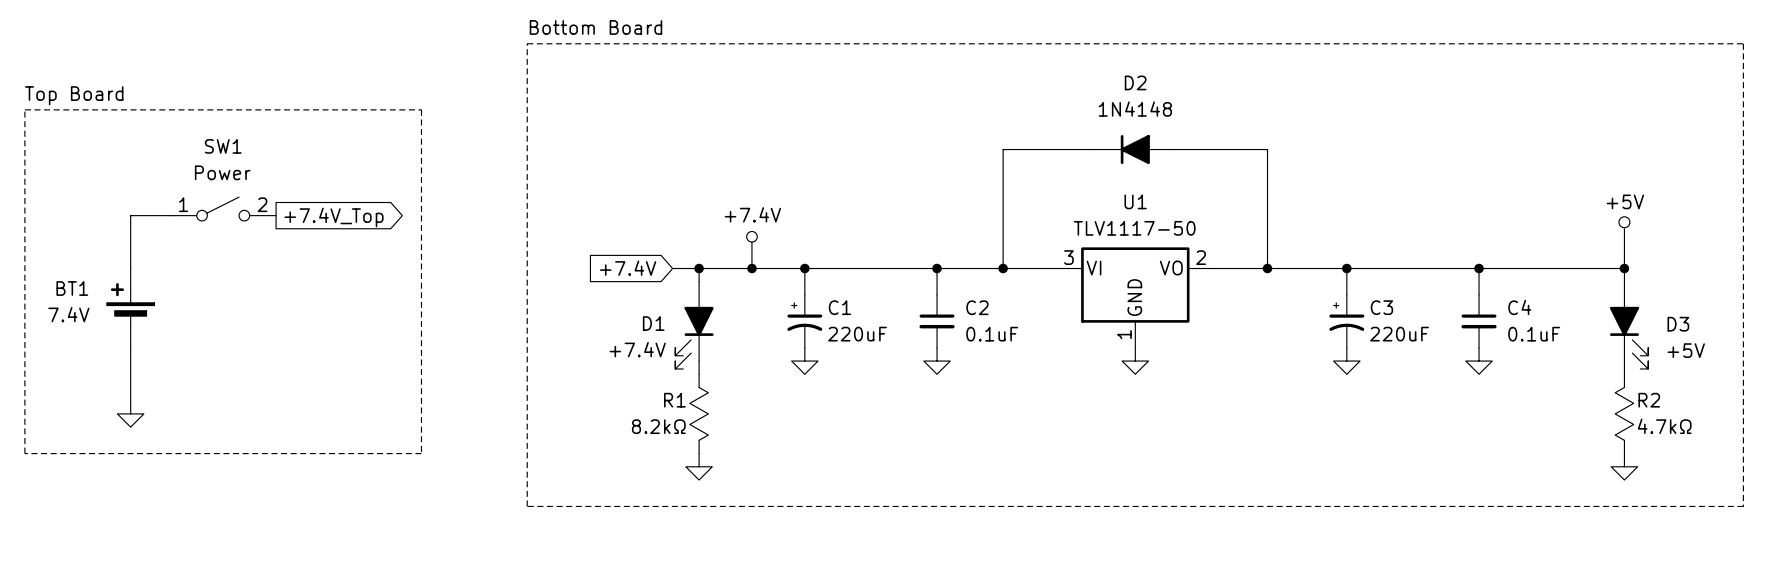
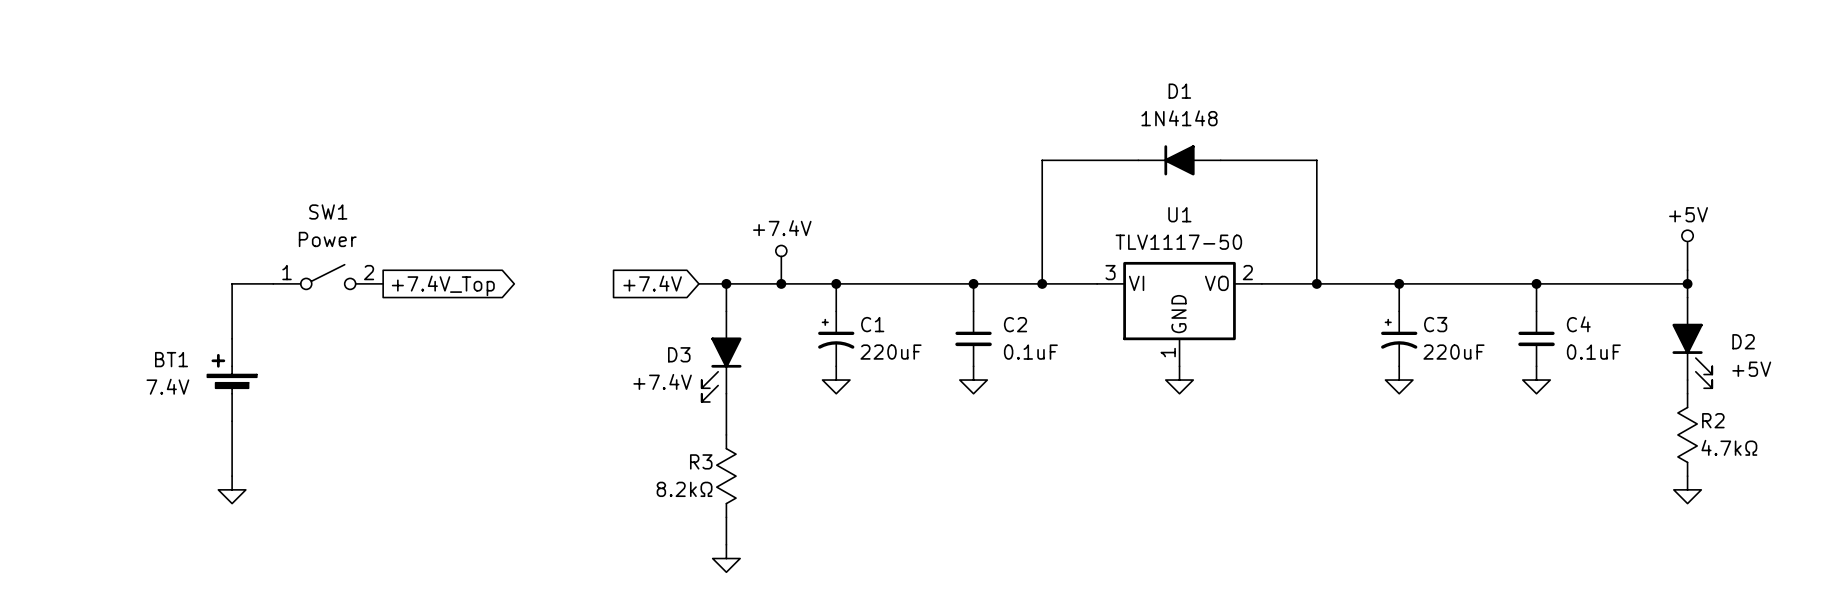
text: Bottom Board (595, 27) -> none
line: (527, 43) (1743, 43) (1743, 506) (527, 506) (527, 43) -> none
D2 name: D2 (1135, 82) -> D1 (1179, 91)
text: Top Board (74, 95) -> none
line: (24, 109) (421, 109) (421, 453) (24, 453) (24, 109) -> none
SW1 position: (223, 209) -> (328, 277)
wire: (170, 215) (130, 215) (130, 268) -> (273, 283) (232, 283) (232, 338)
global label position: +7.4V_Top (334, 217) -> +7.4V_Top (443, 285)
BT1 position: (130, 308) -> (232, 380)
D3 name: D3 (1678, 324) -> D2 (1743, 341)
D1: +7.4V (694, 325) -> none
D3: none -> +7.4V (721, 356)
wire: (130, 347) (130, 400) -> (232, 421) (232, 476)
power symbol position: (130, 413) -> (232, 489)
R1: 8.2kΩ (699, 413) -> none
R3: none -> 8.2kΩ (726, 476)
power symbol position: (699, 466) -> (726, 558)
wire: none -> (726, 517) (726, 544)

